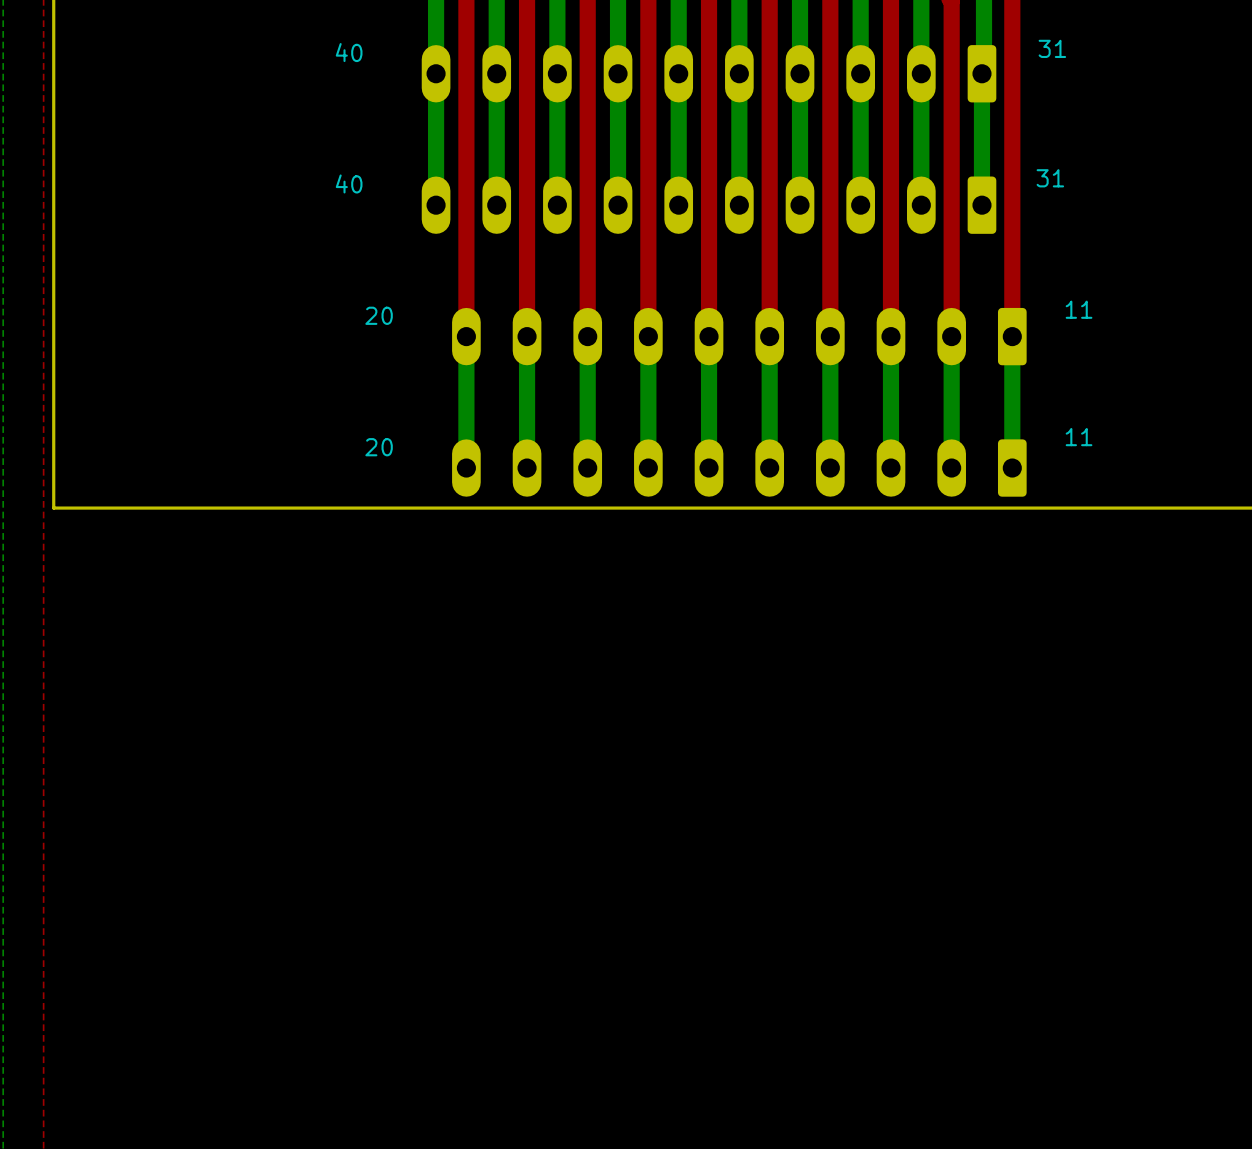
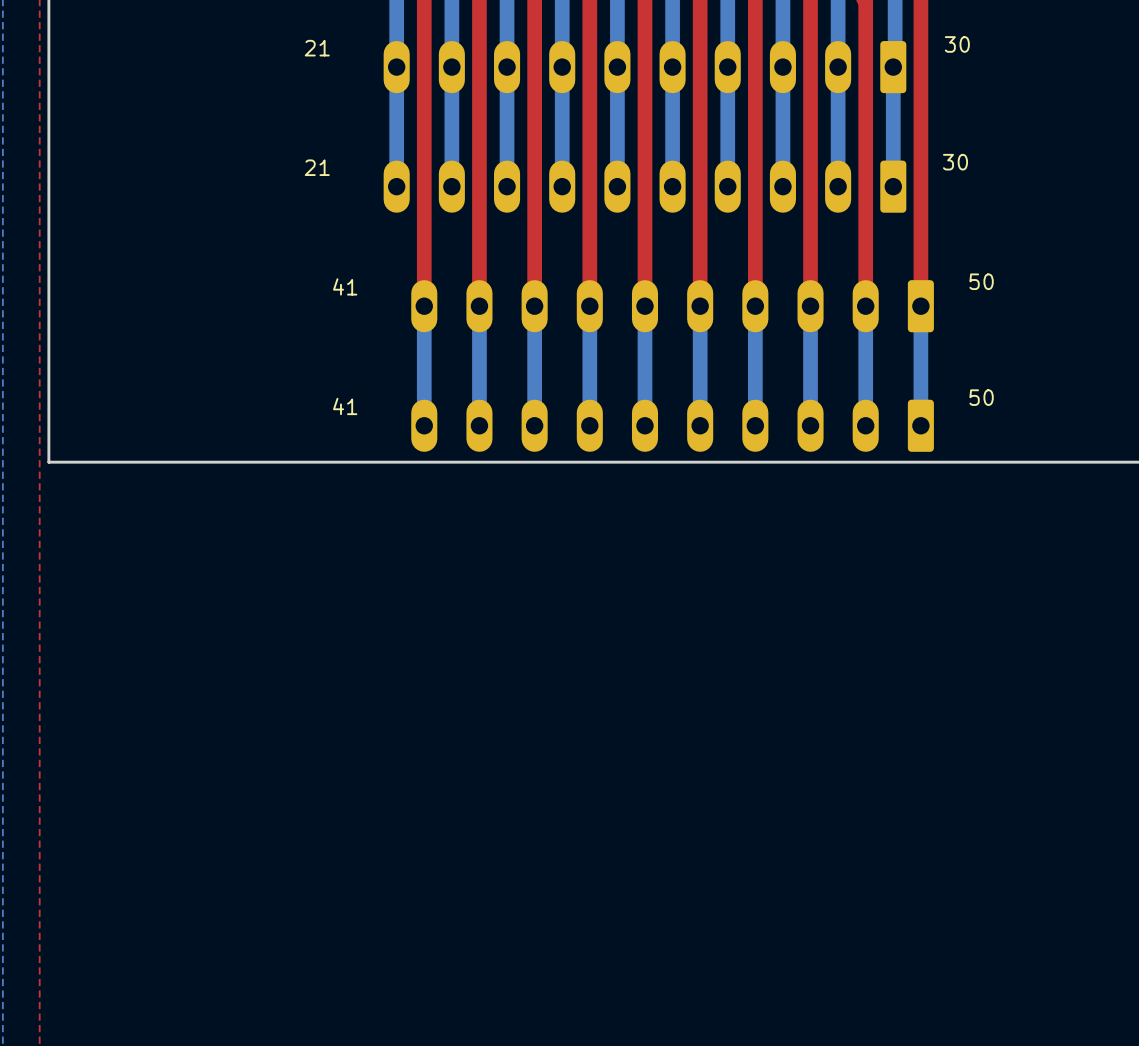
text: 31 (1052, 48) -> 30 (957, 44)
text: 40 (349, 52) -> 21 (317, 48)
text: 31 (1050, 178) -> 30 (955, 162)
text: 40 (349, 183) -> 21 (317, 167)
text: 11 (1079, 309) -> 50 (981, 281)
text: 20 (379, 315) -> 41 (345, 286)
text: 11 (1079, 437) -> 50 (981, 397)
text: 20 (379, 447) -> 41 (345, 406)

